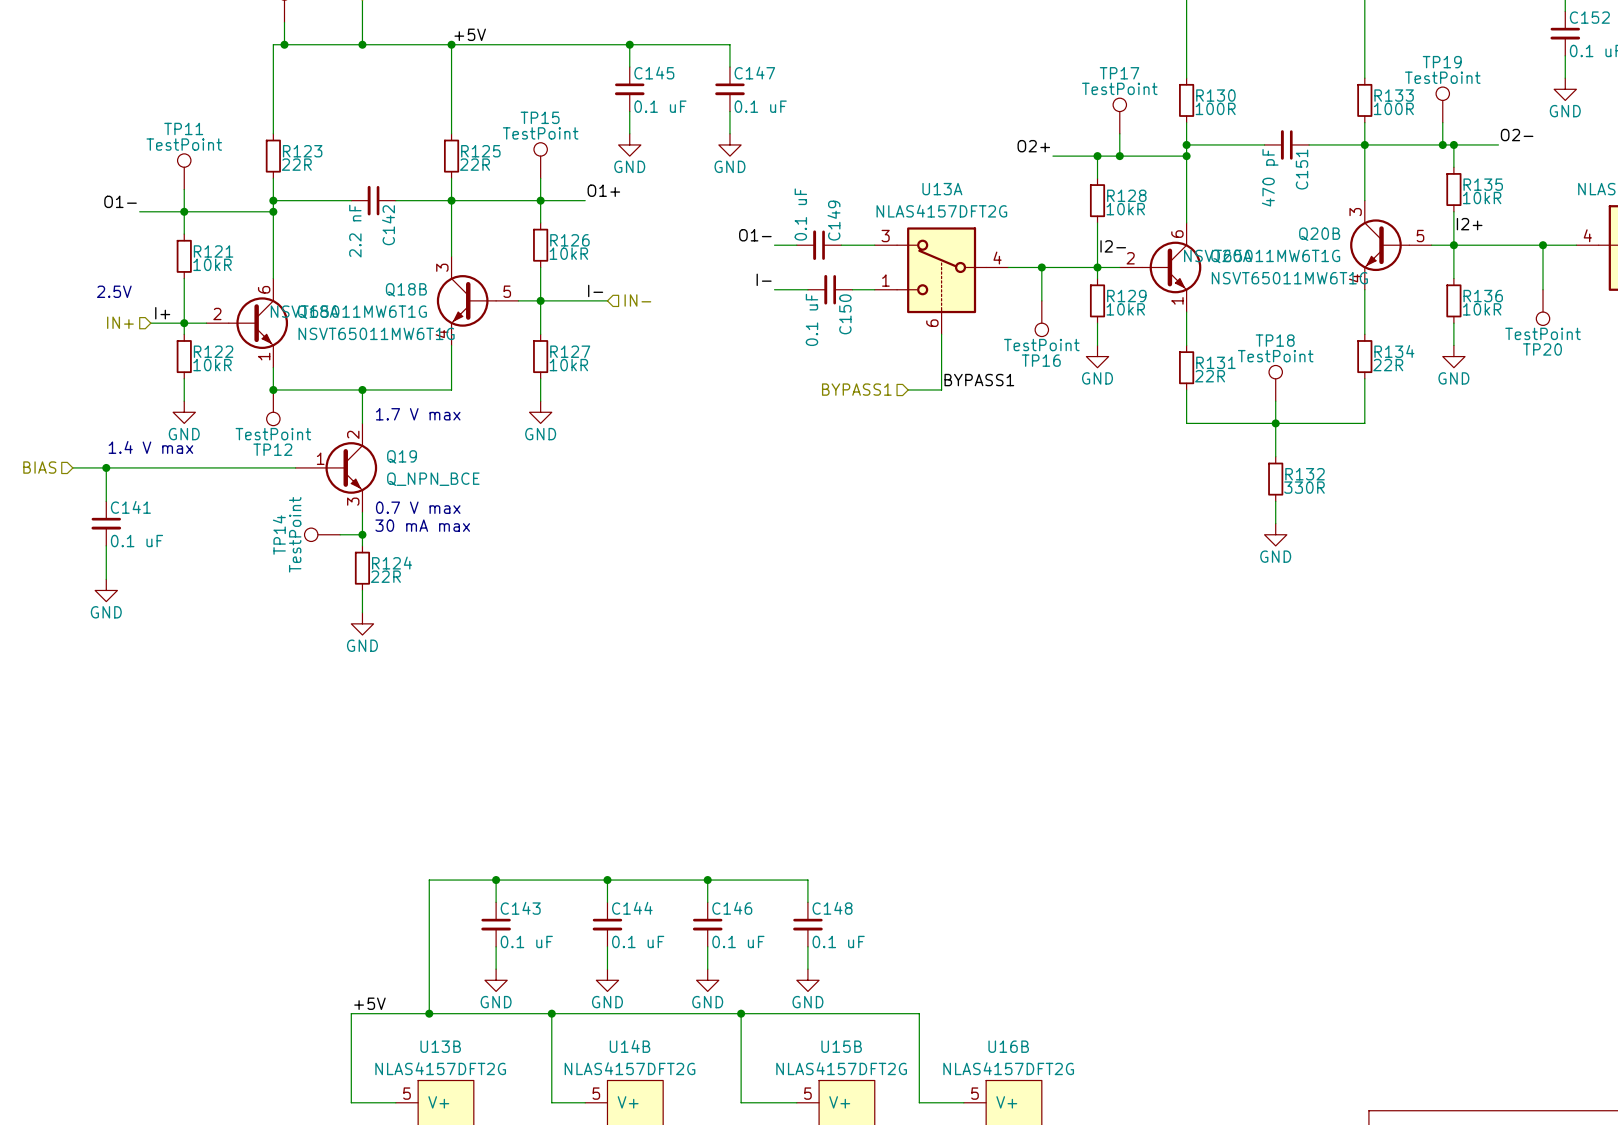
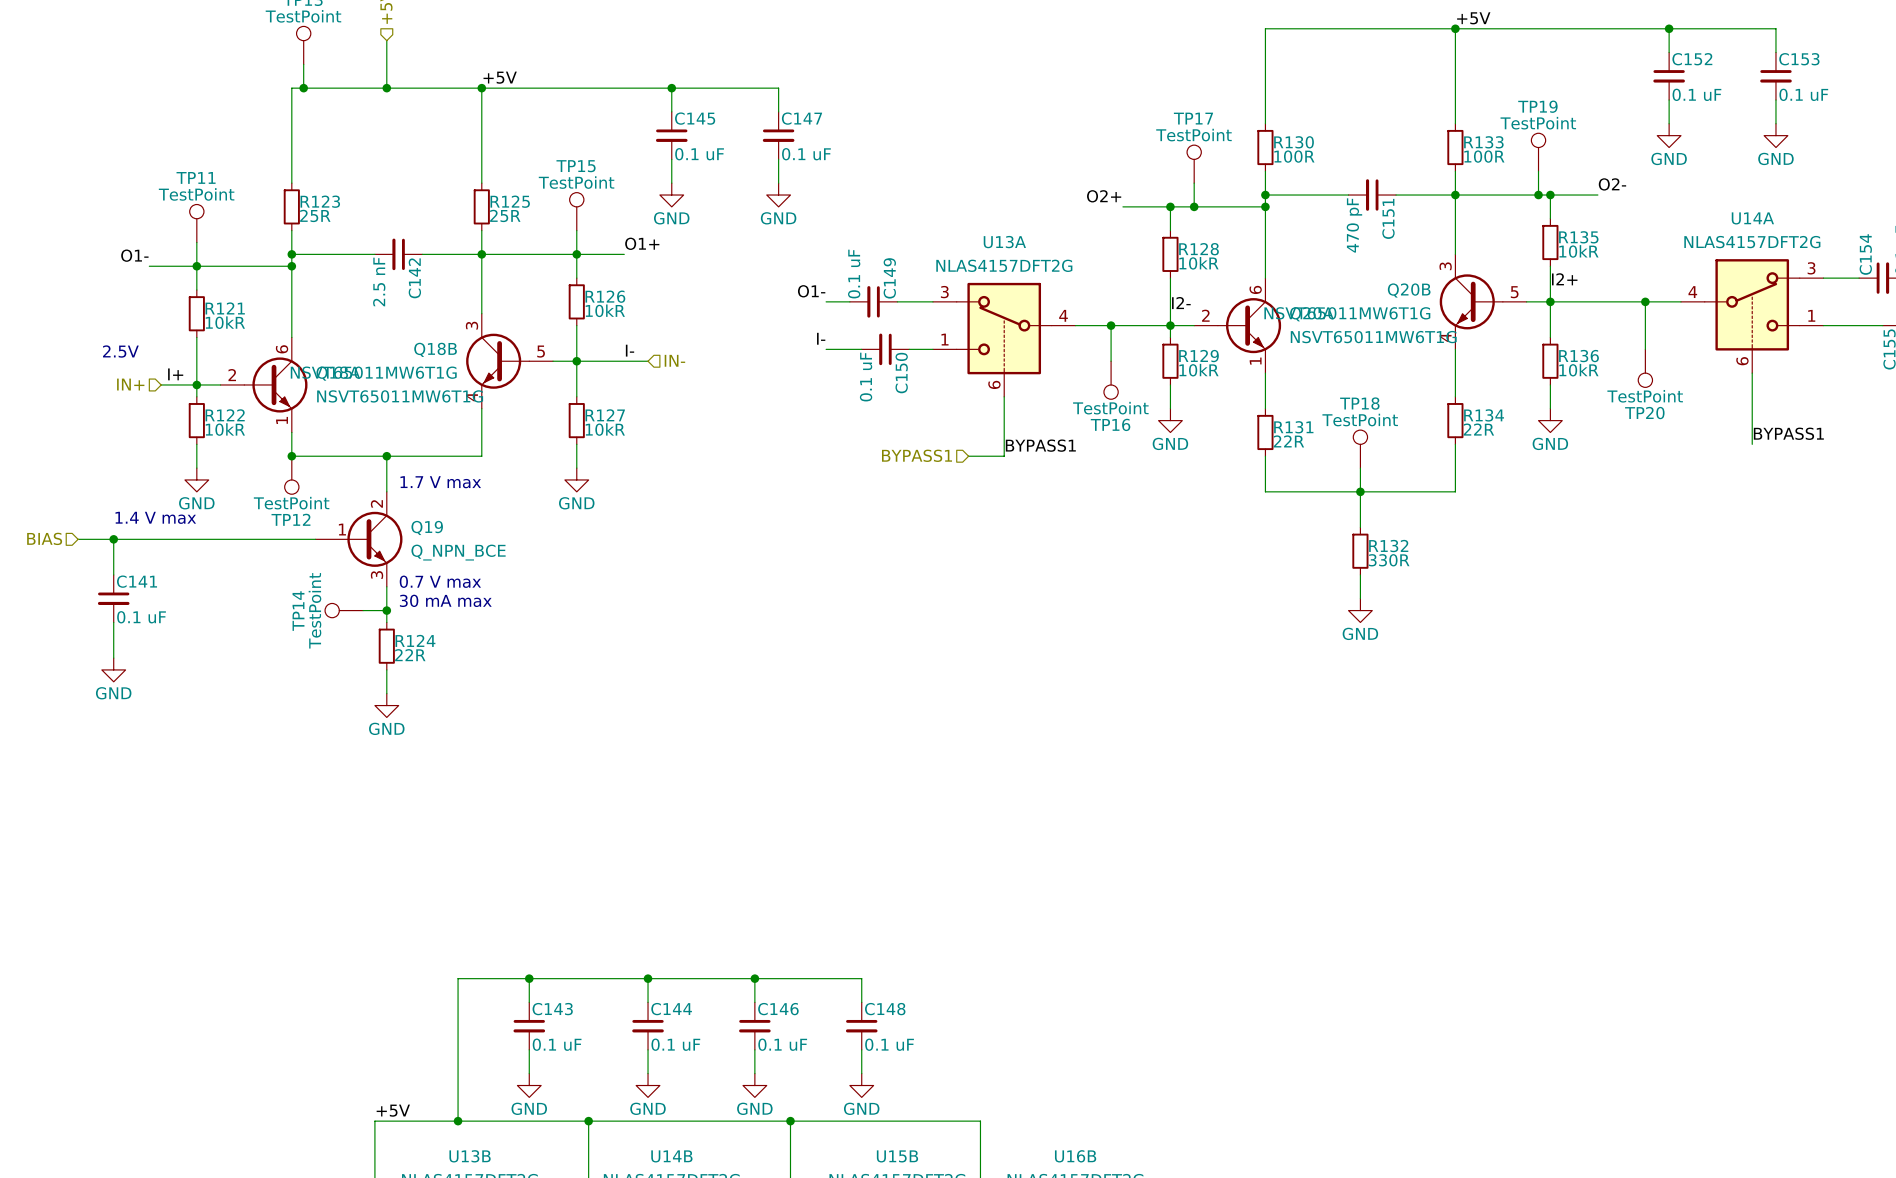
R123 value: 22R (296, 164) -> 25R (315, 215)
R125 value: 22R (475, 164) -> 25R (505, 215)
C142 value: 2.2 nF (355, 231) -> 2.5 nF (379, 282)

